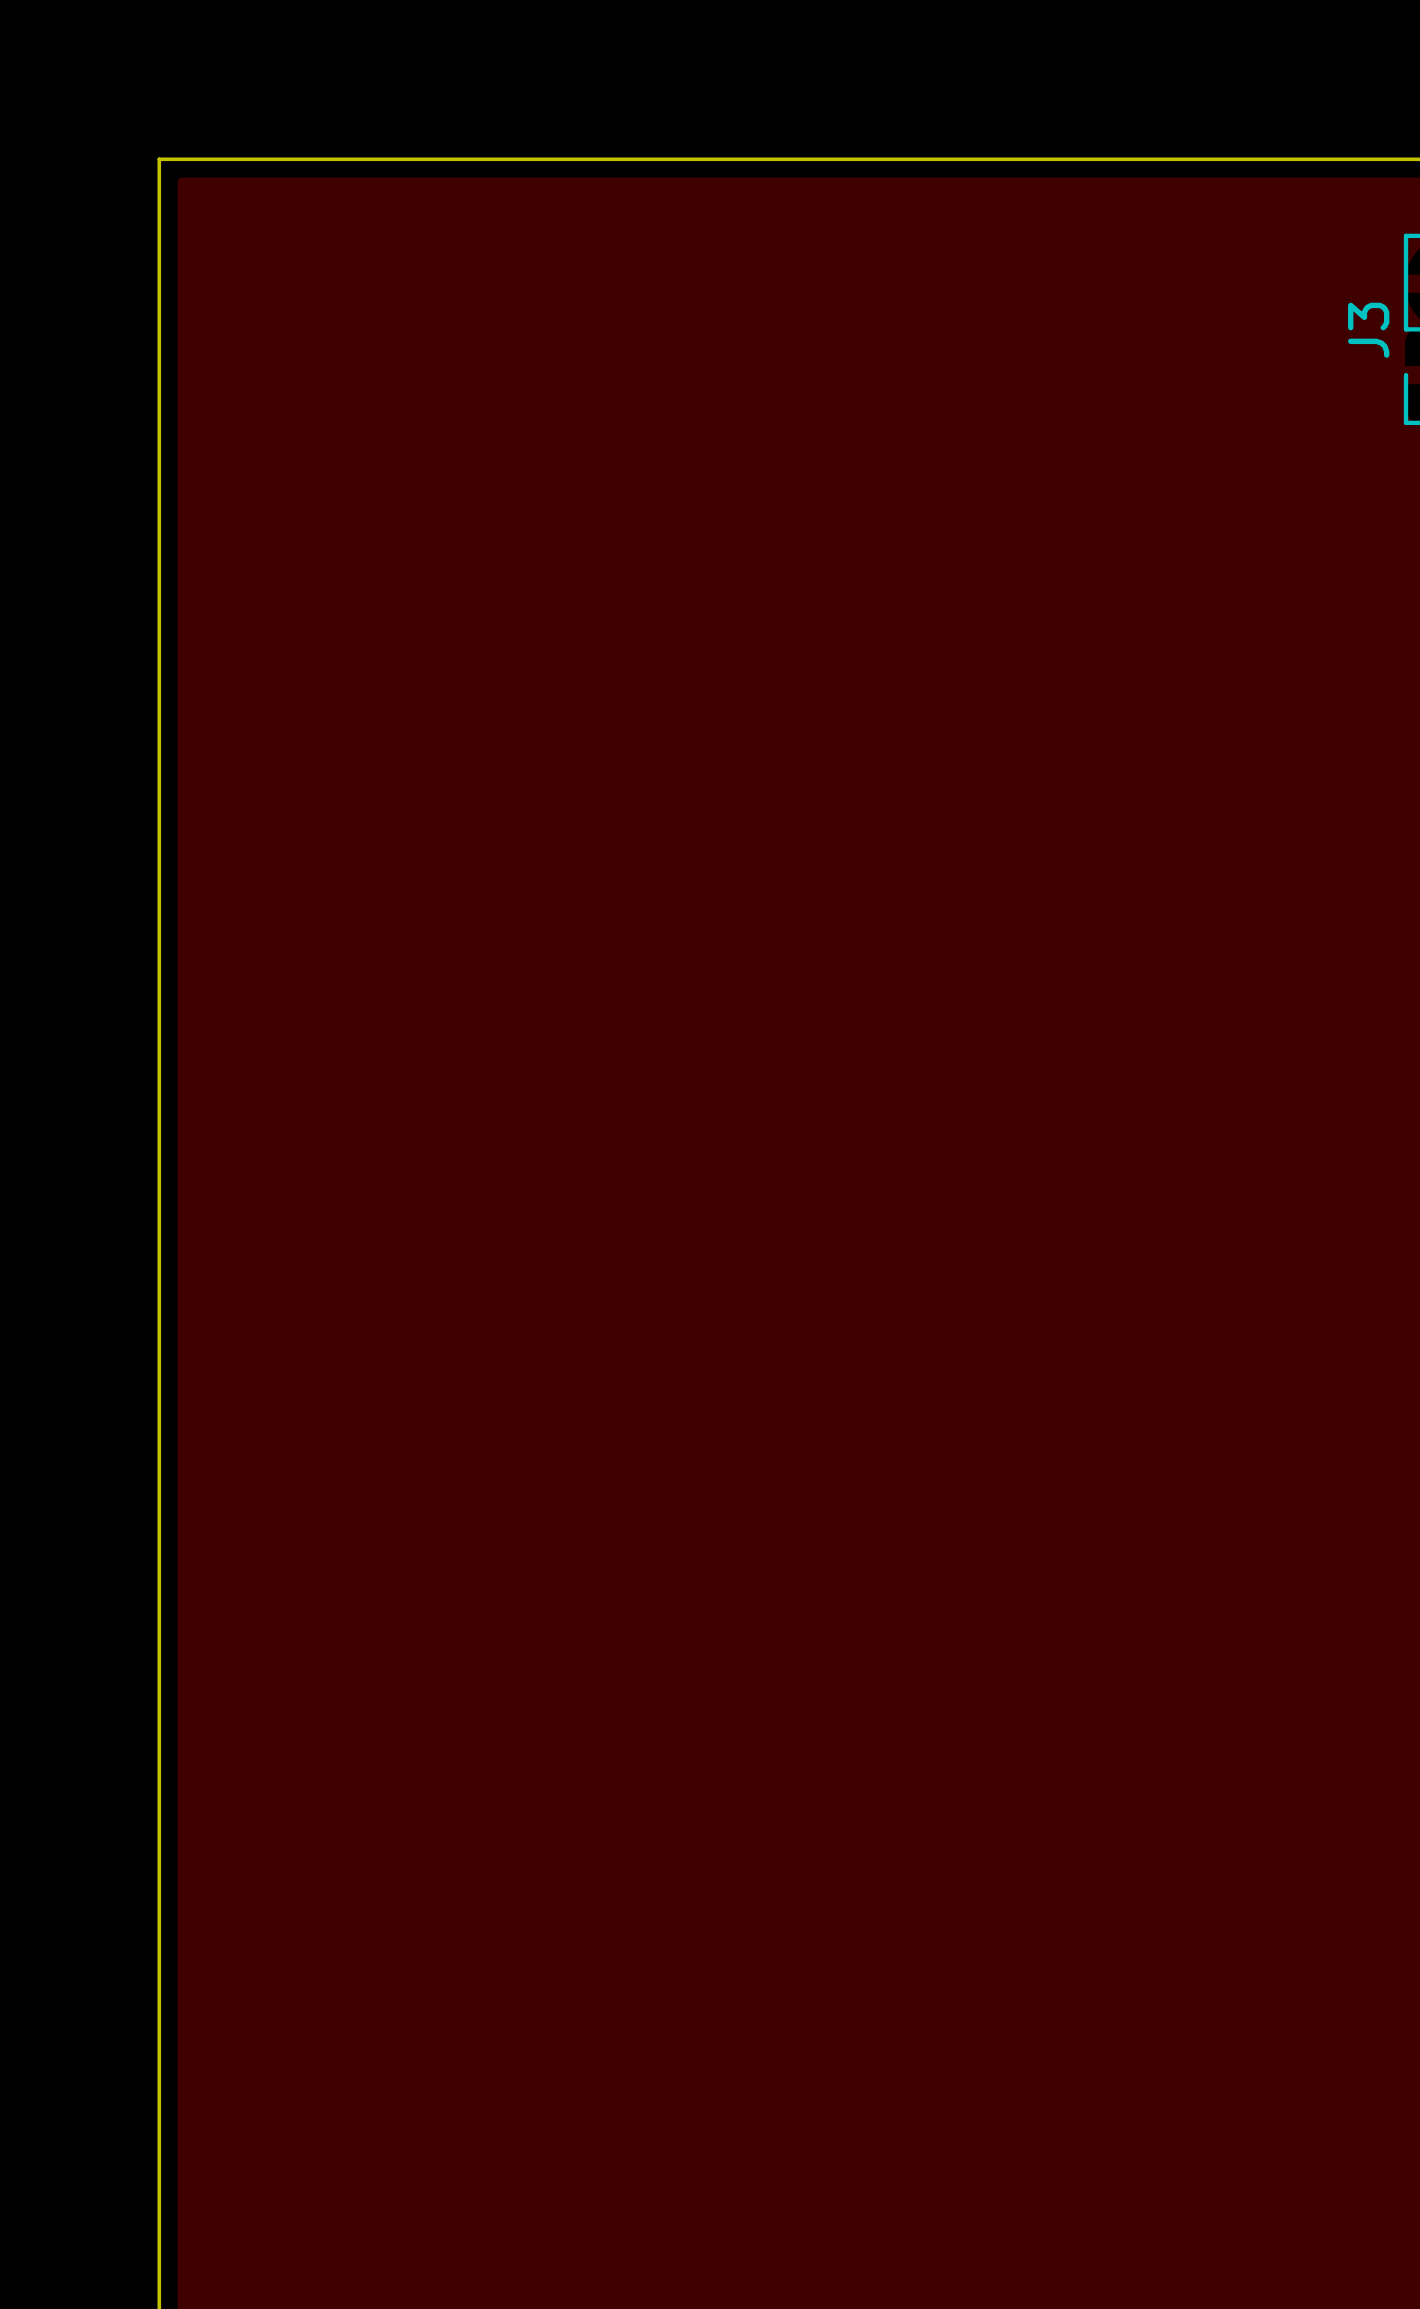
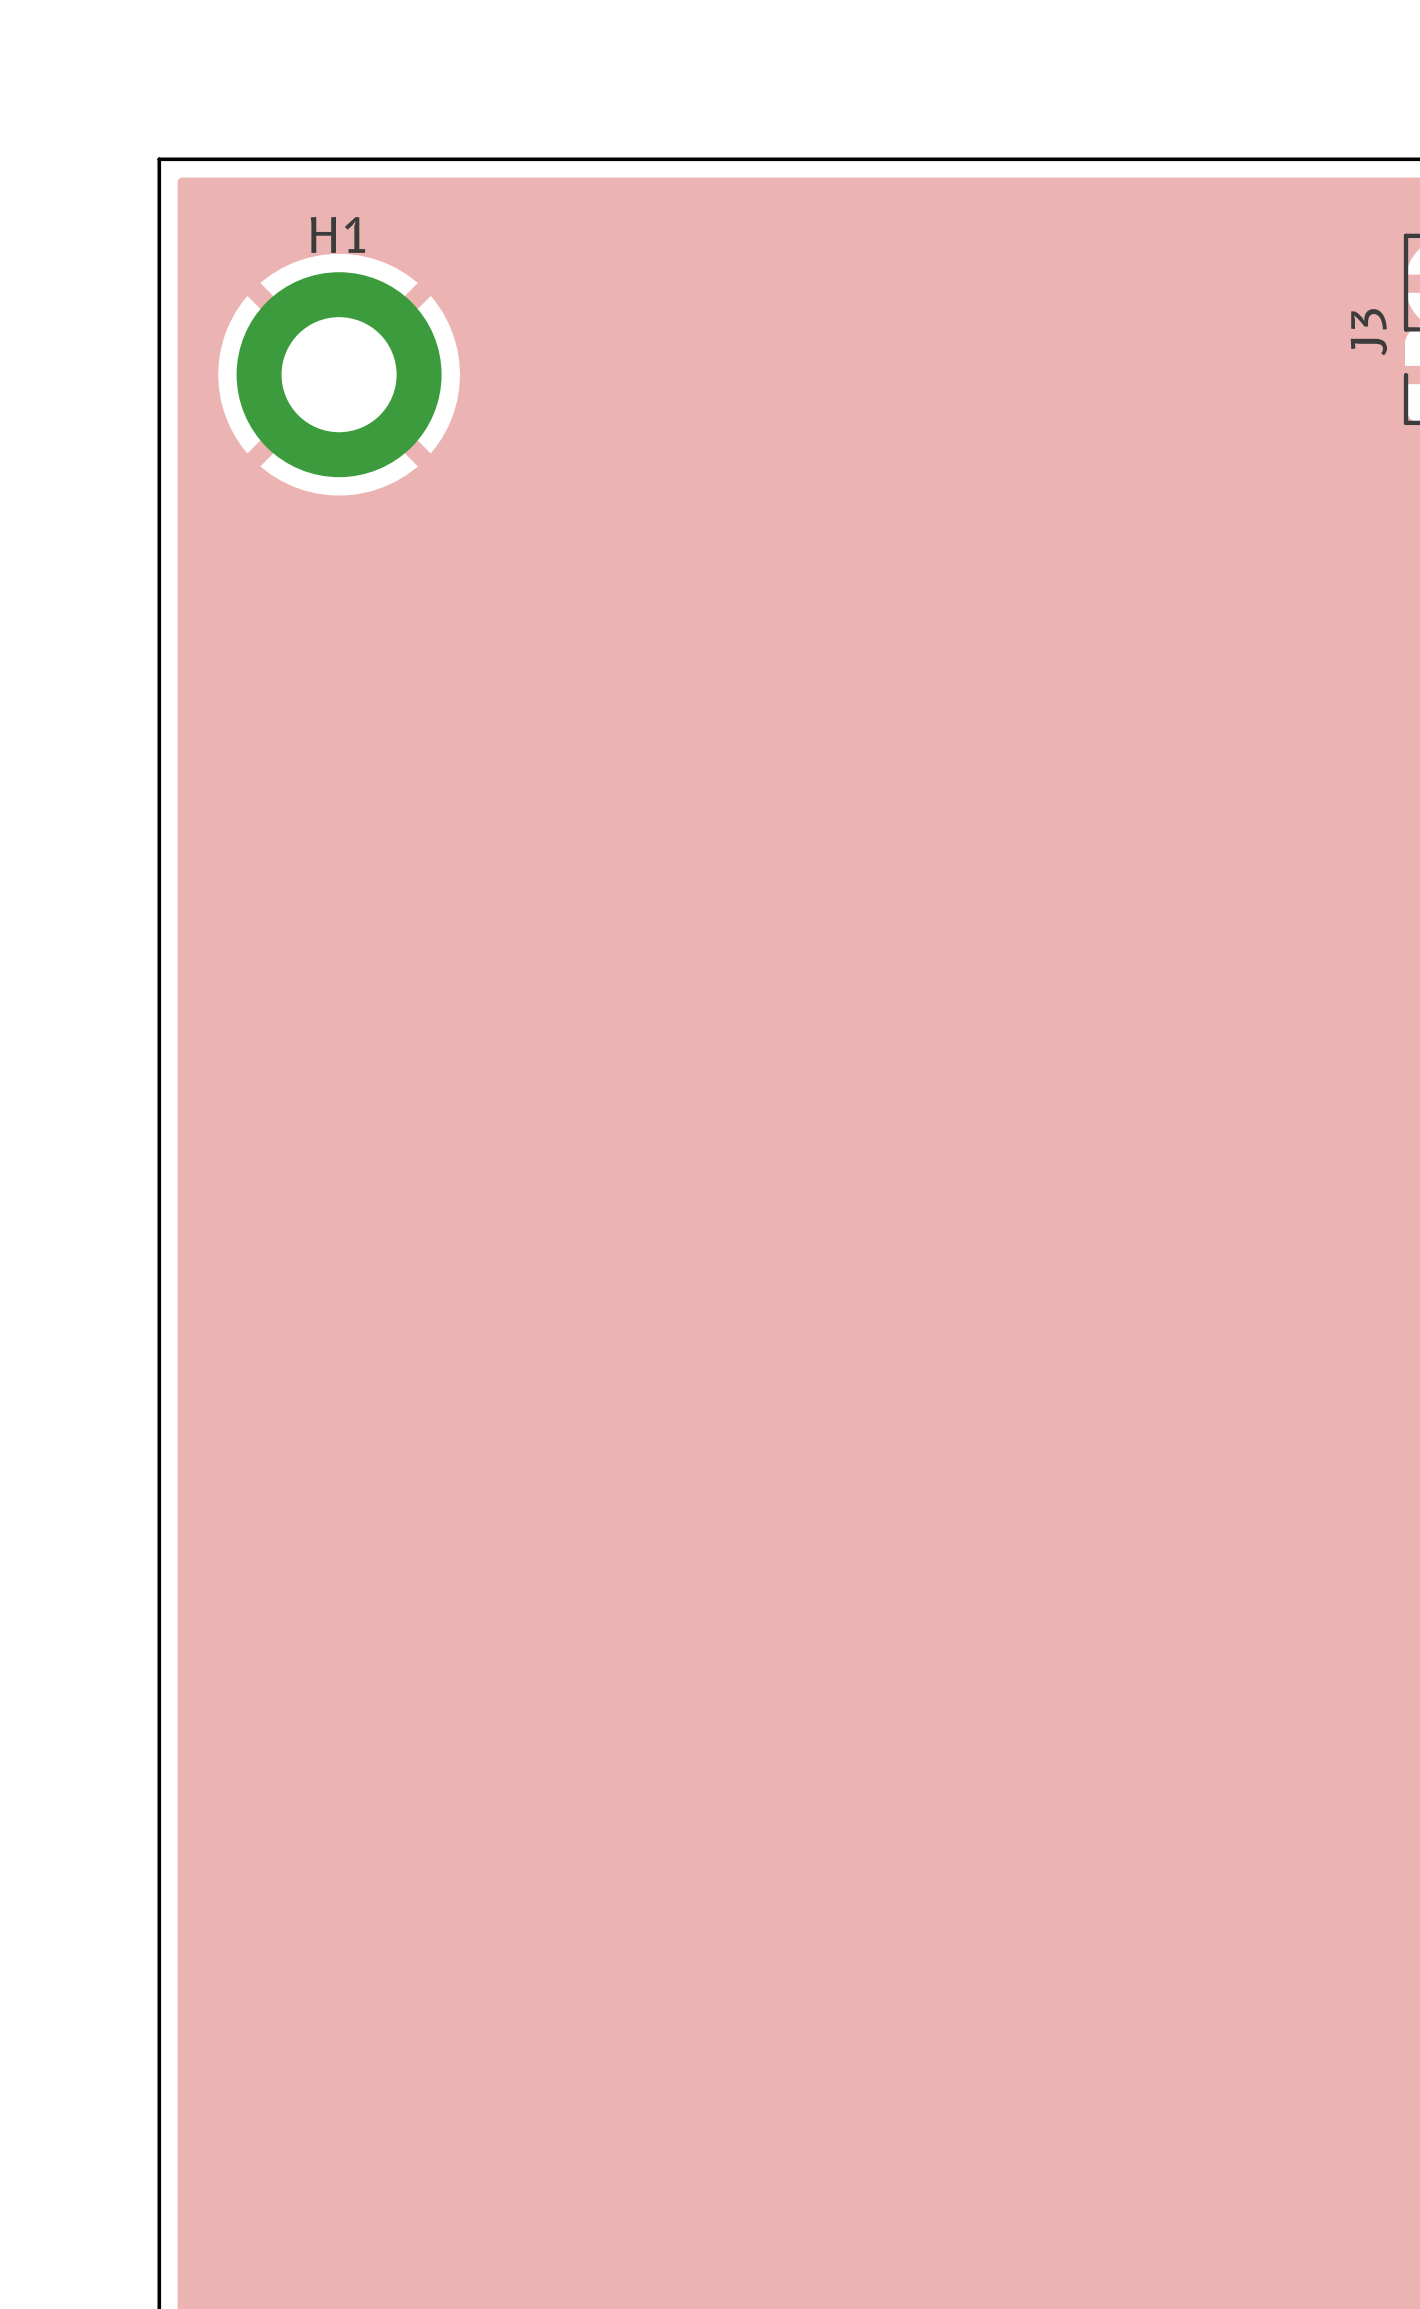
H1: none -> (339, 374)

